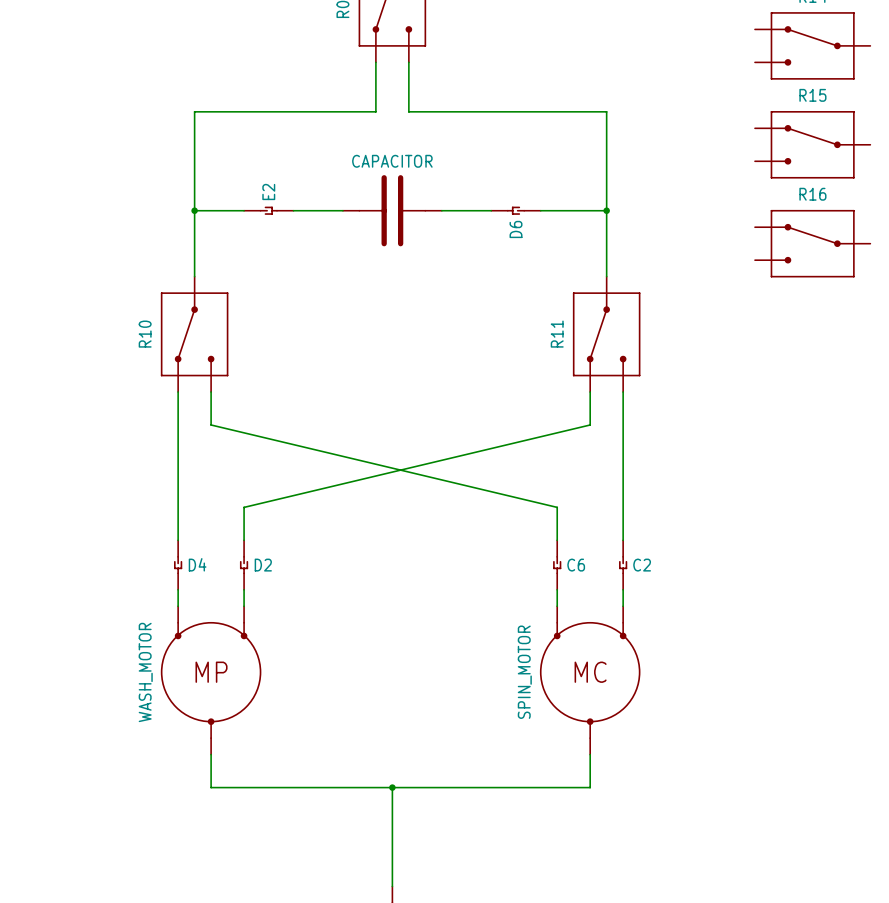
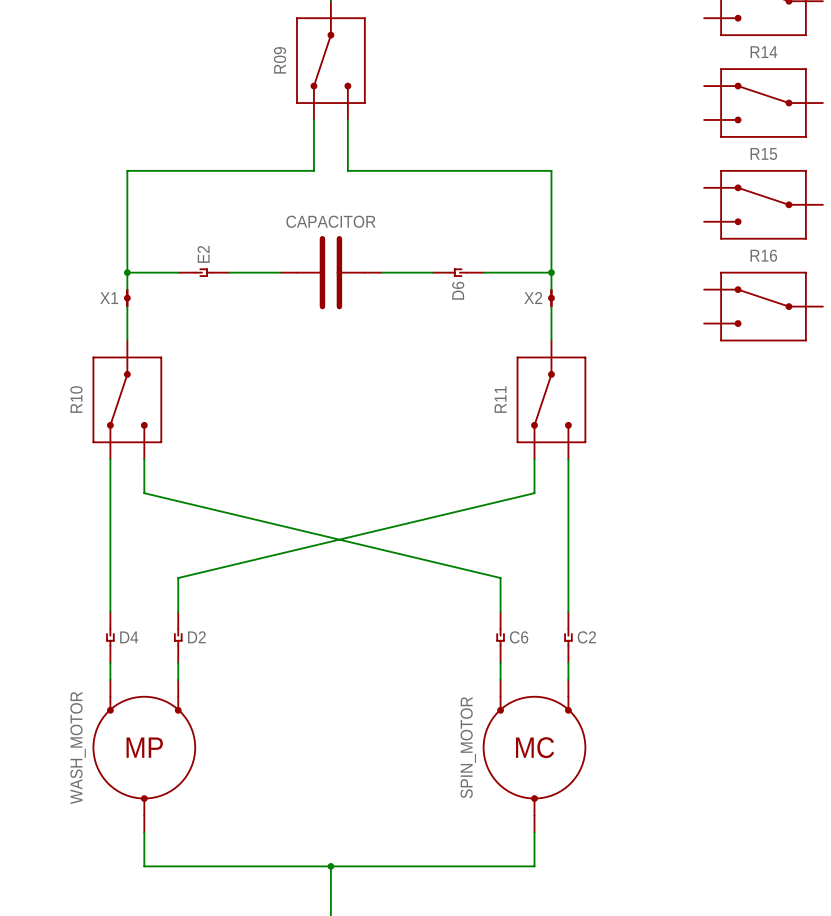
X1: none -> (127, 298)
X2: none -> (551, 298)

